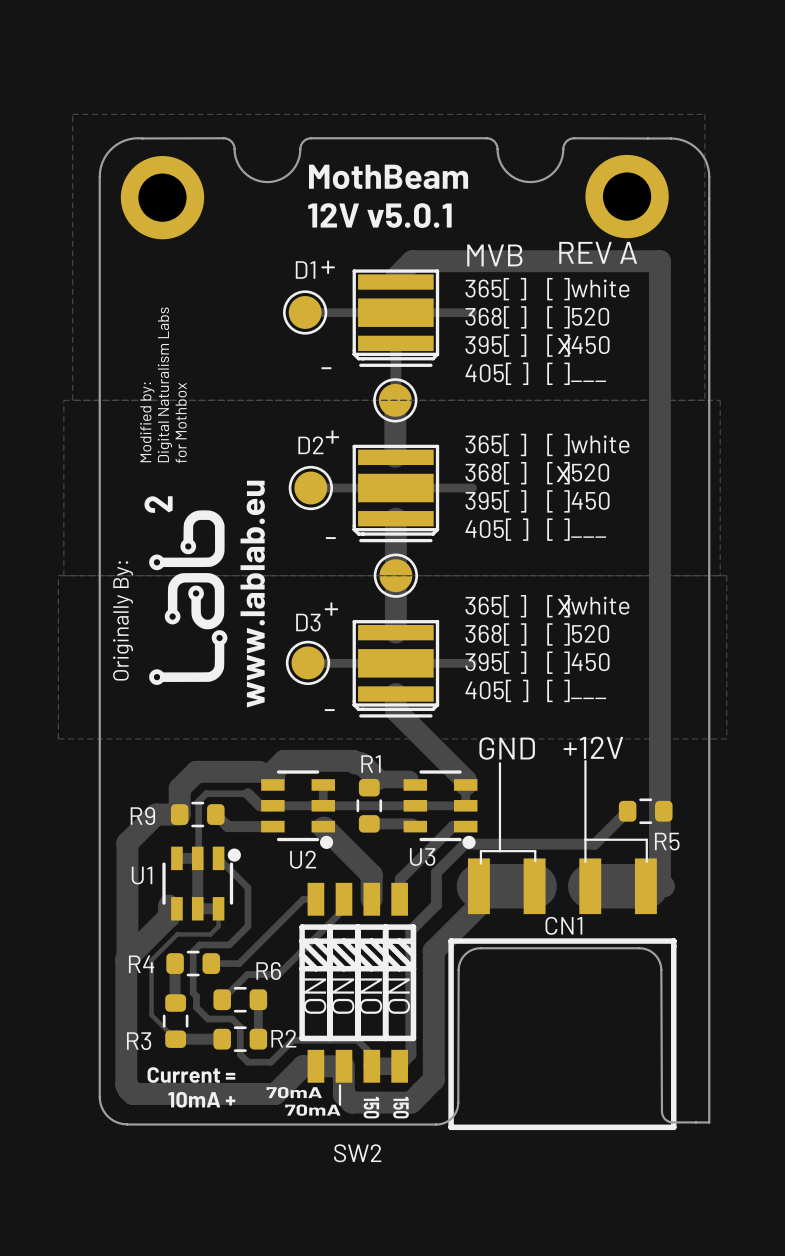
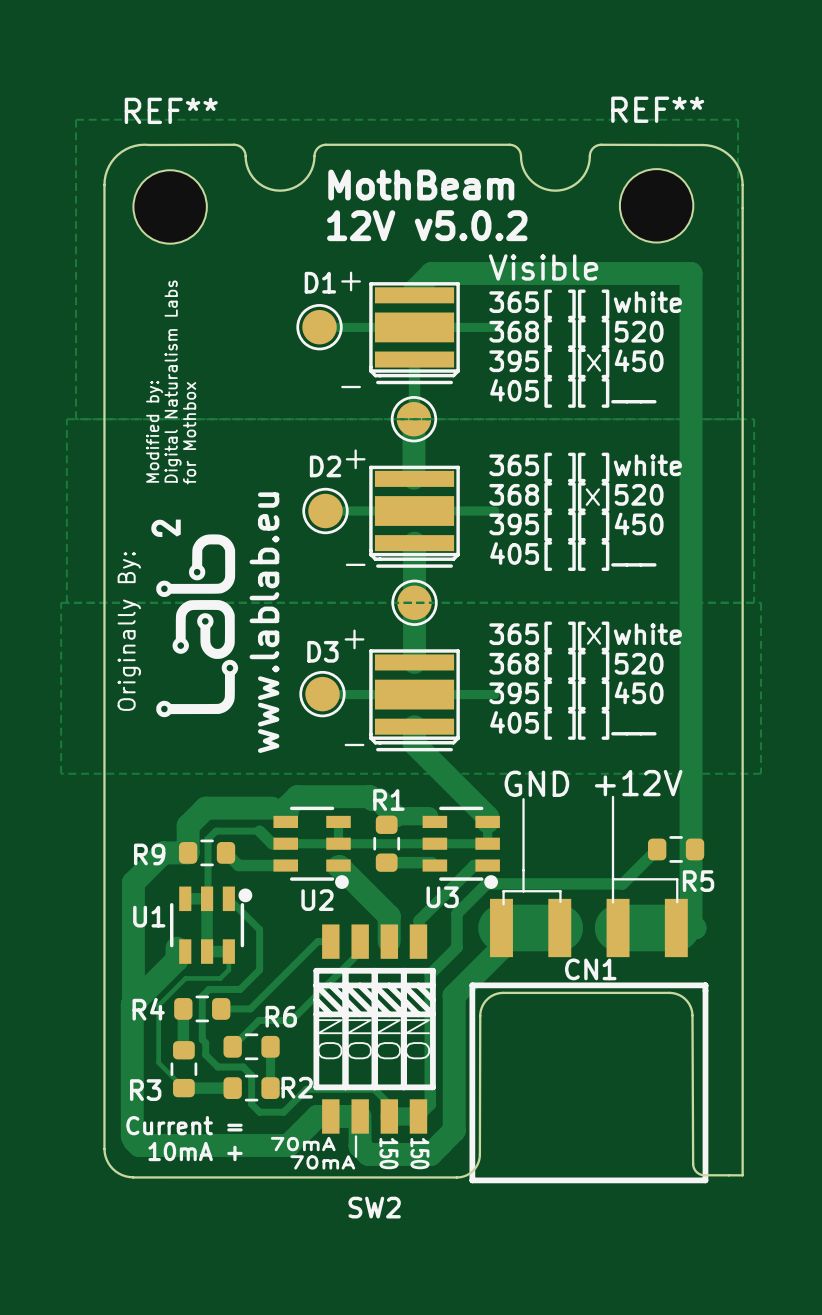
part: (627, 196) -> none
REF**: none -> (656, 205)
part: (162, 197) -> none
REF**: none -> (170, 206)
text: 12V v5.0.1 (379, 215) -> 12V v5.0.2 (427, 225)
text: REV A (598, 252) -> none
text: MVB (494, 255) -> Visible (543, 267)

